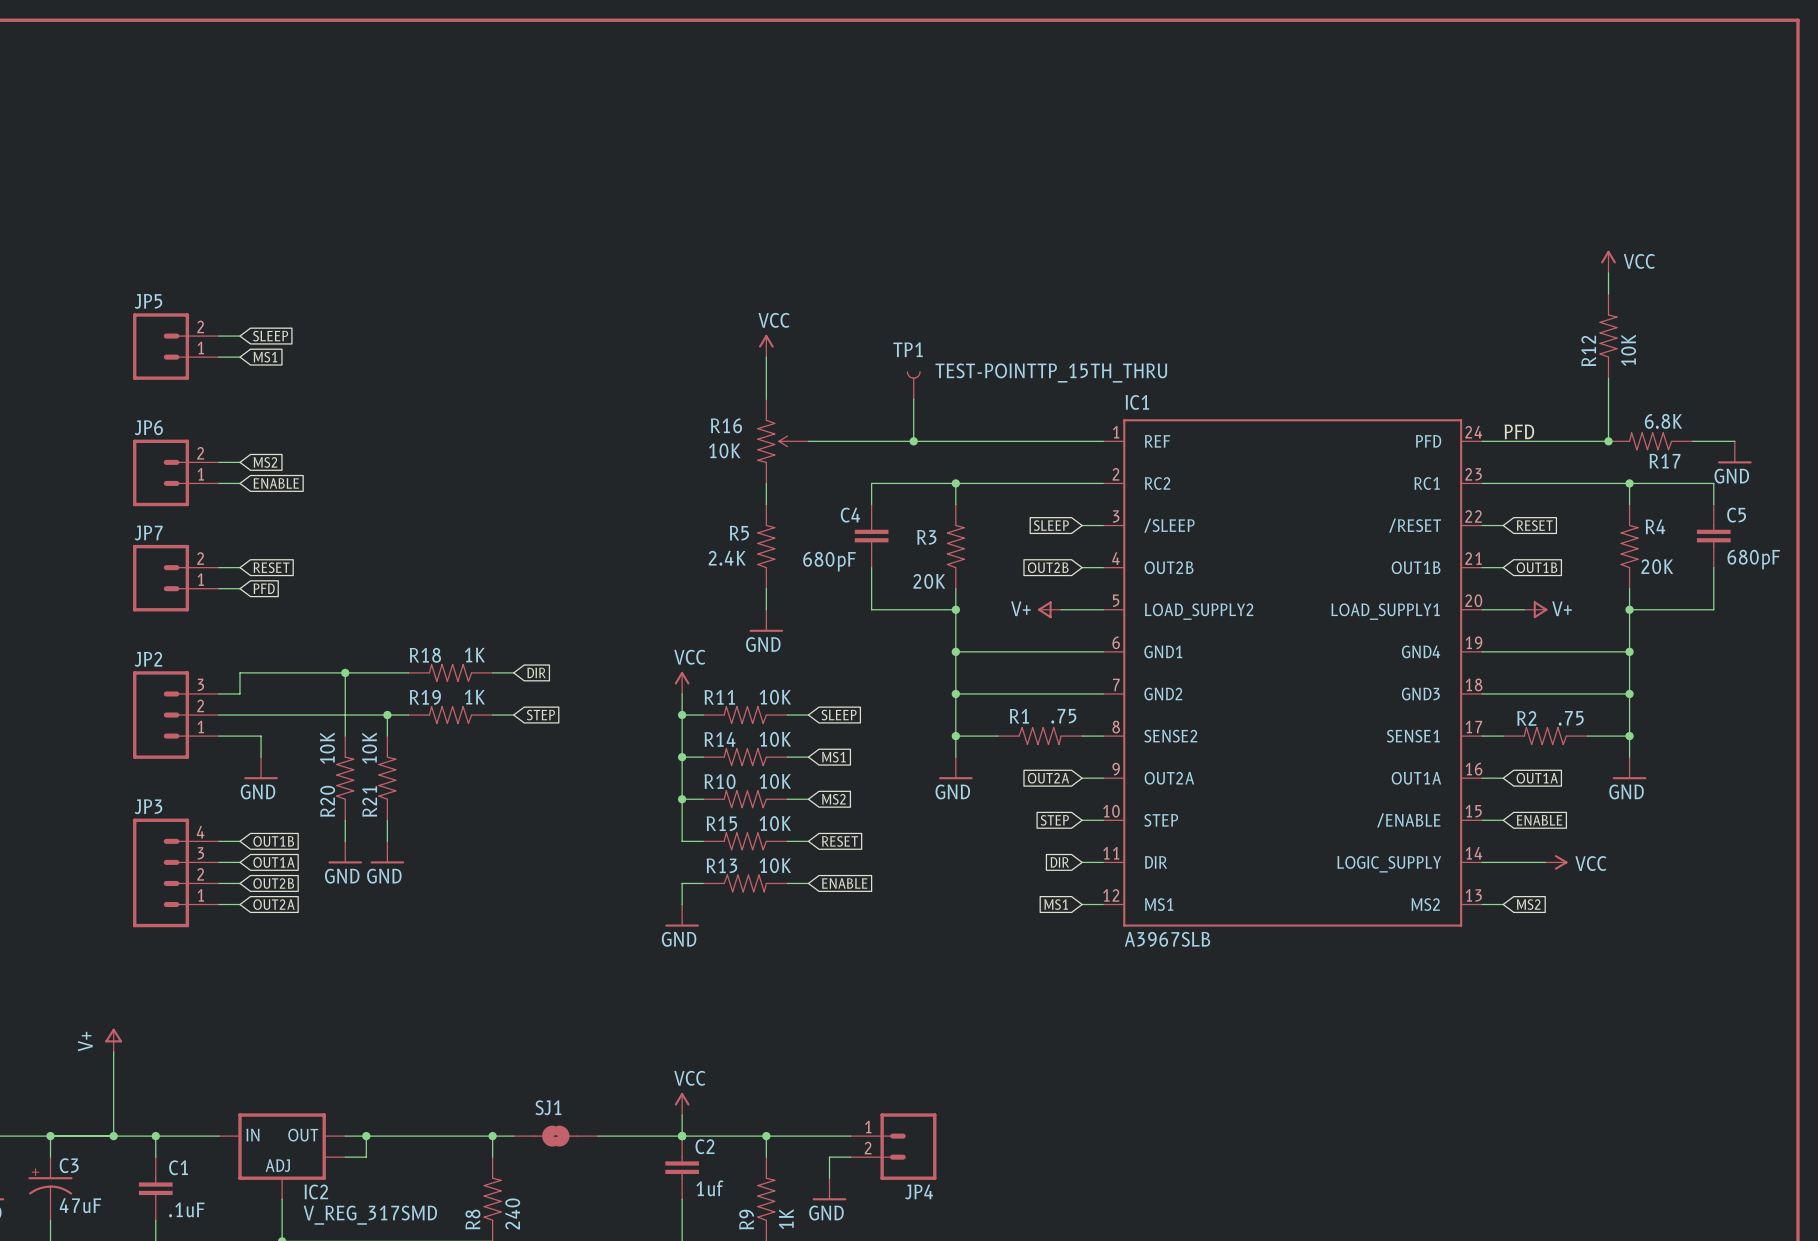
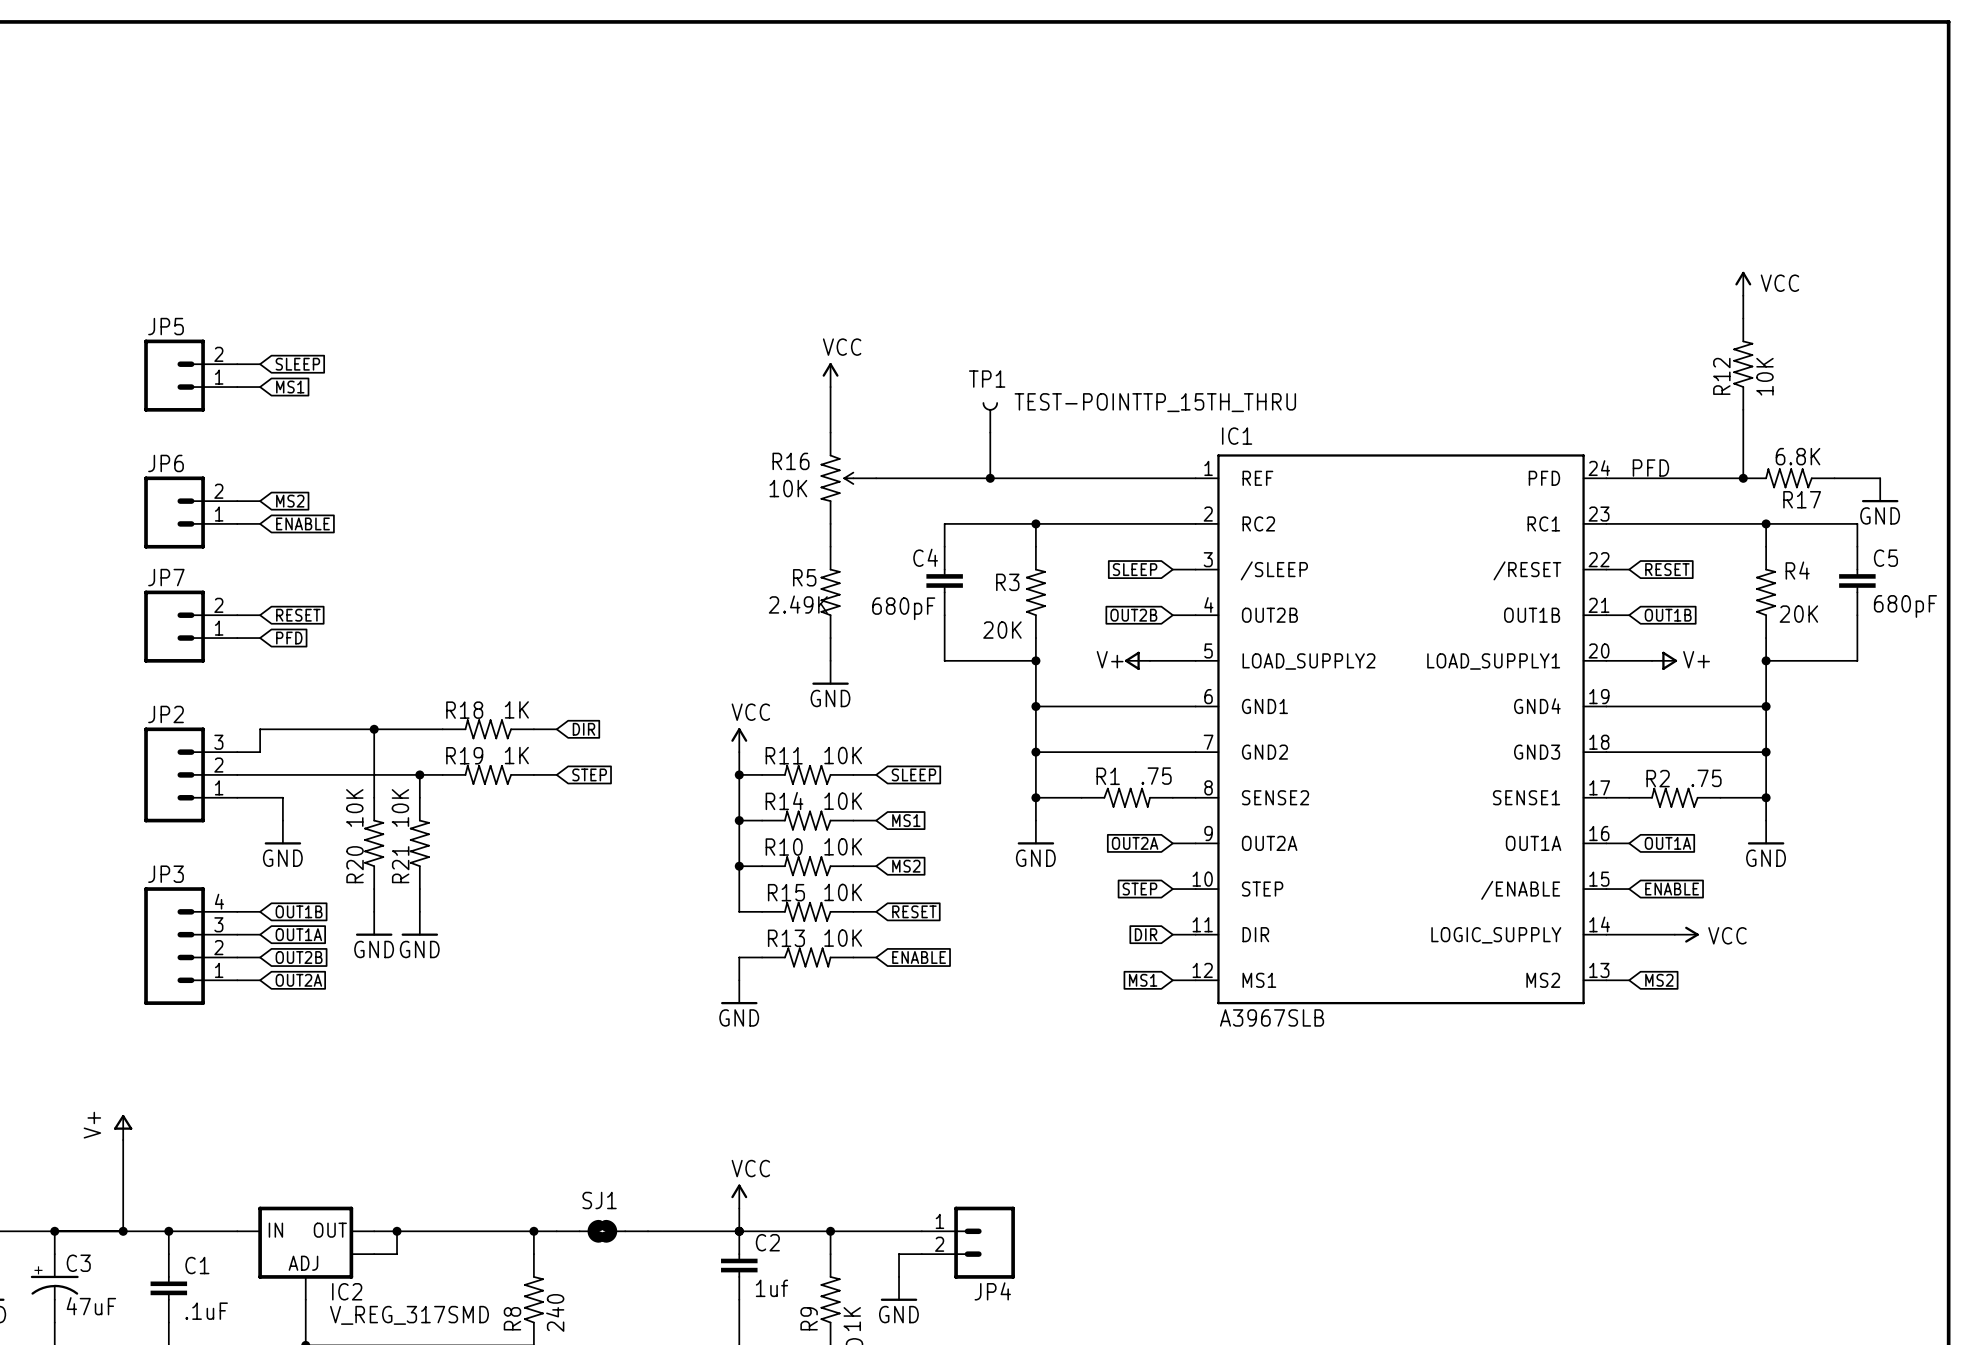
R5 value: 2.4K (727, 558) -> 2.49K (798, 604)

